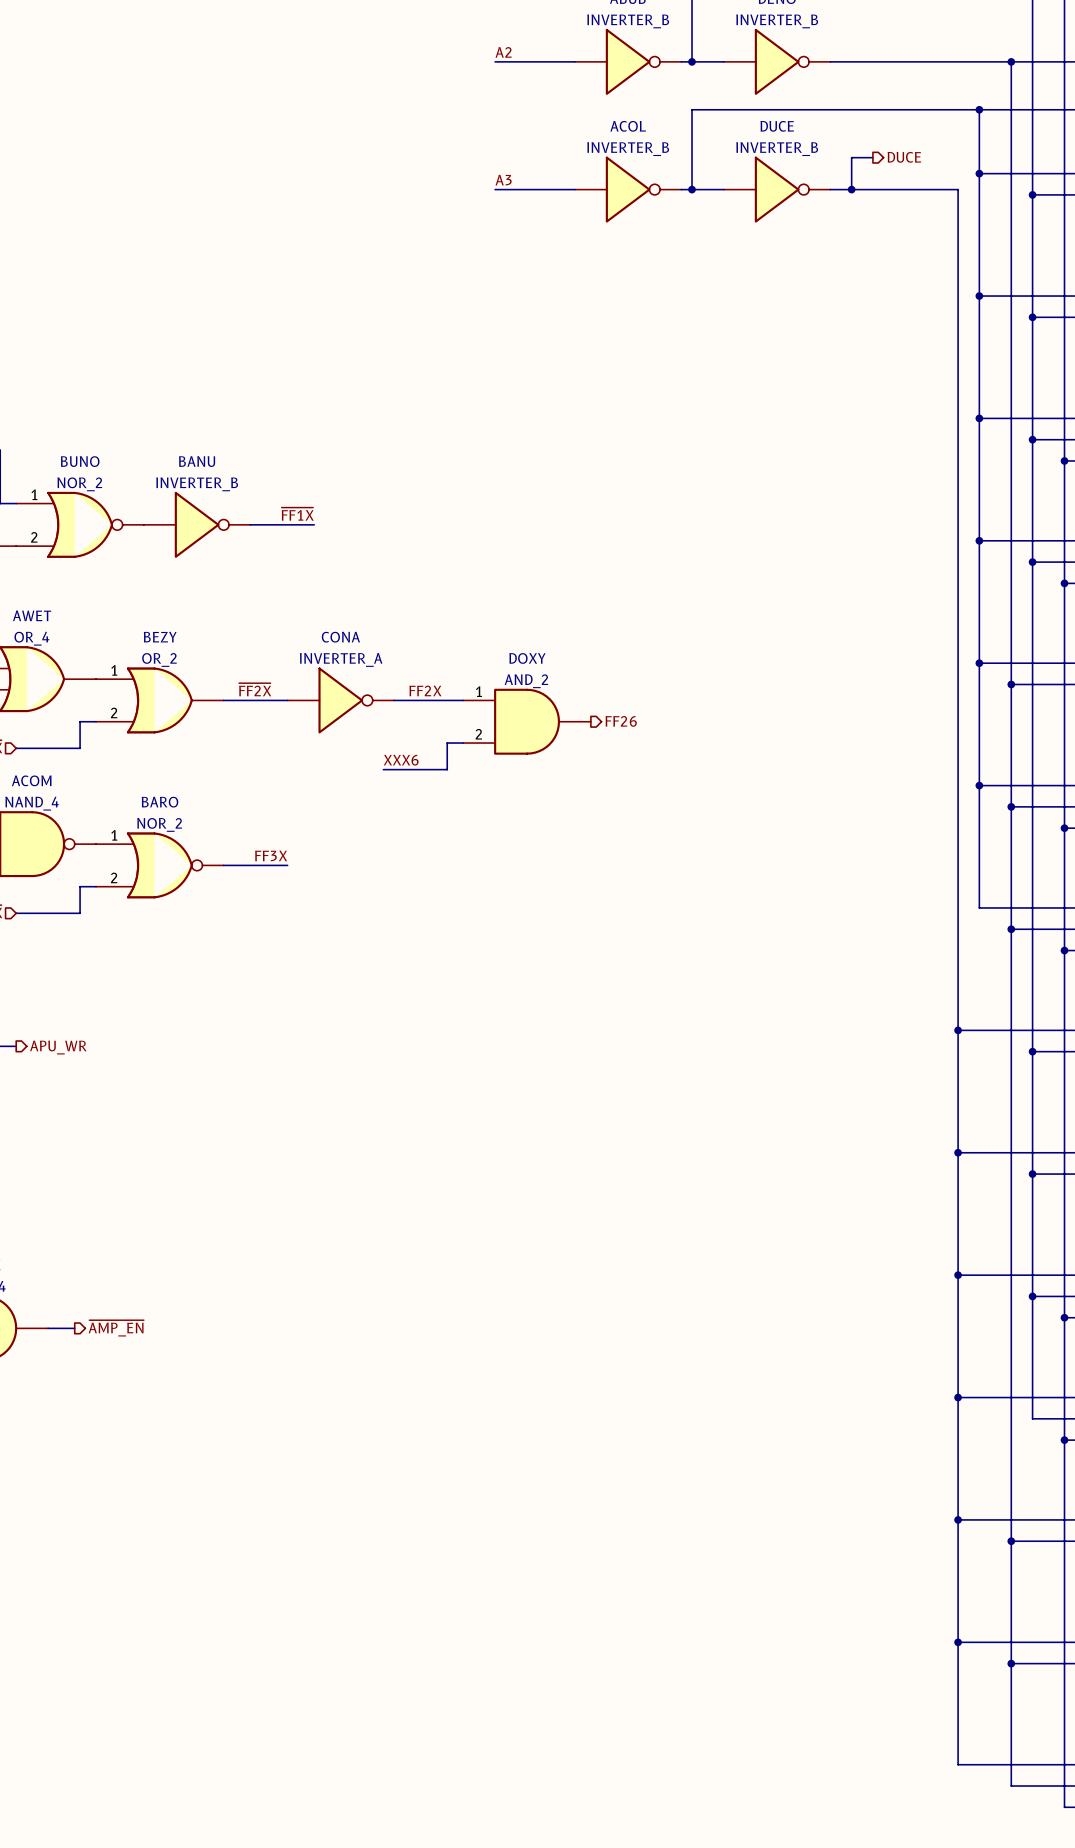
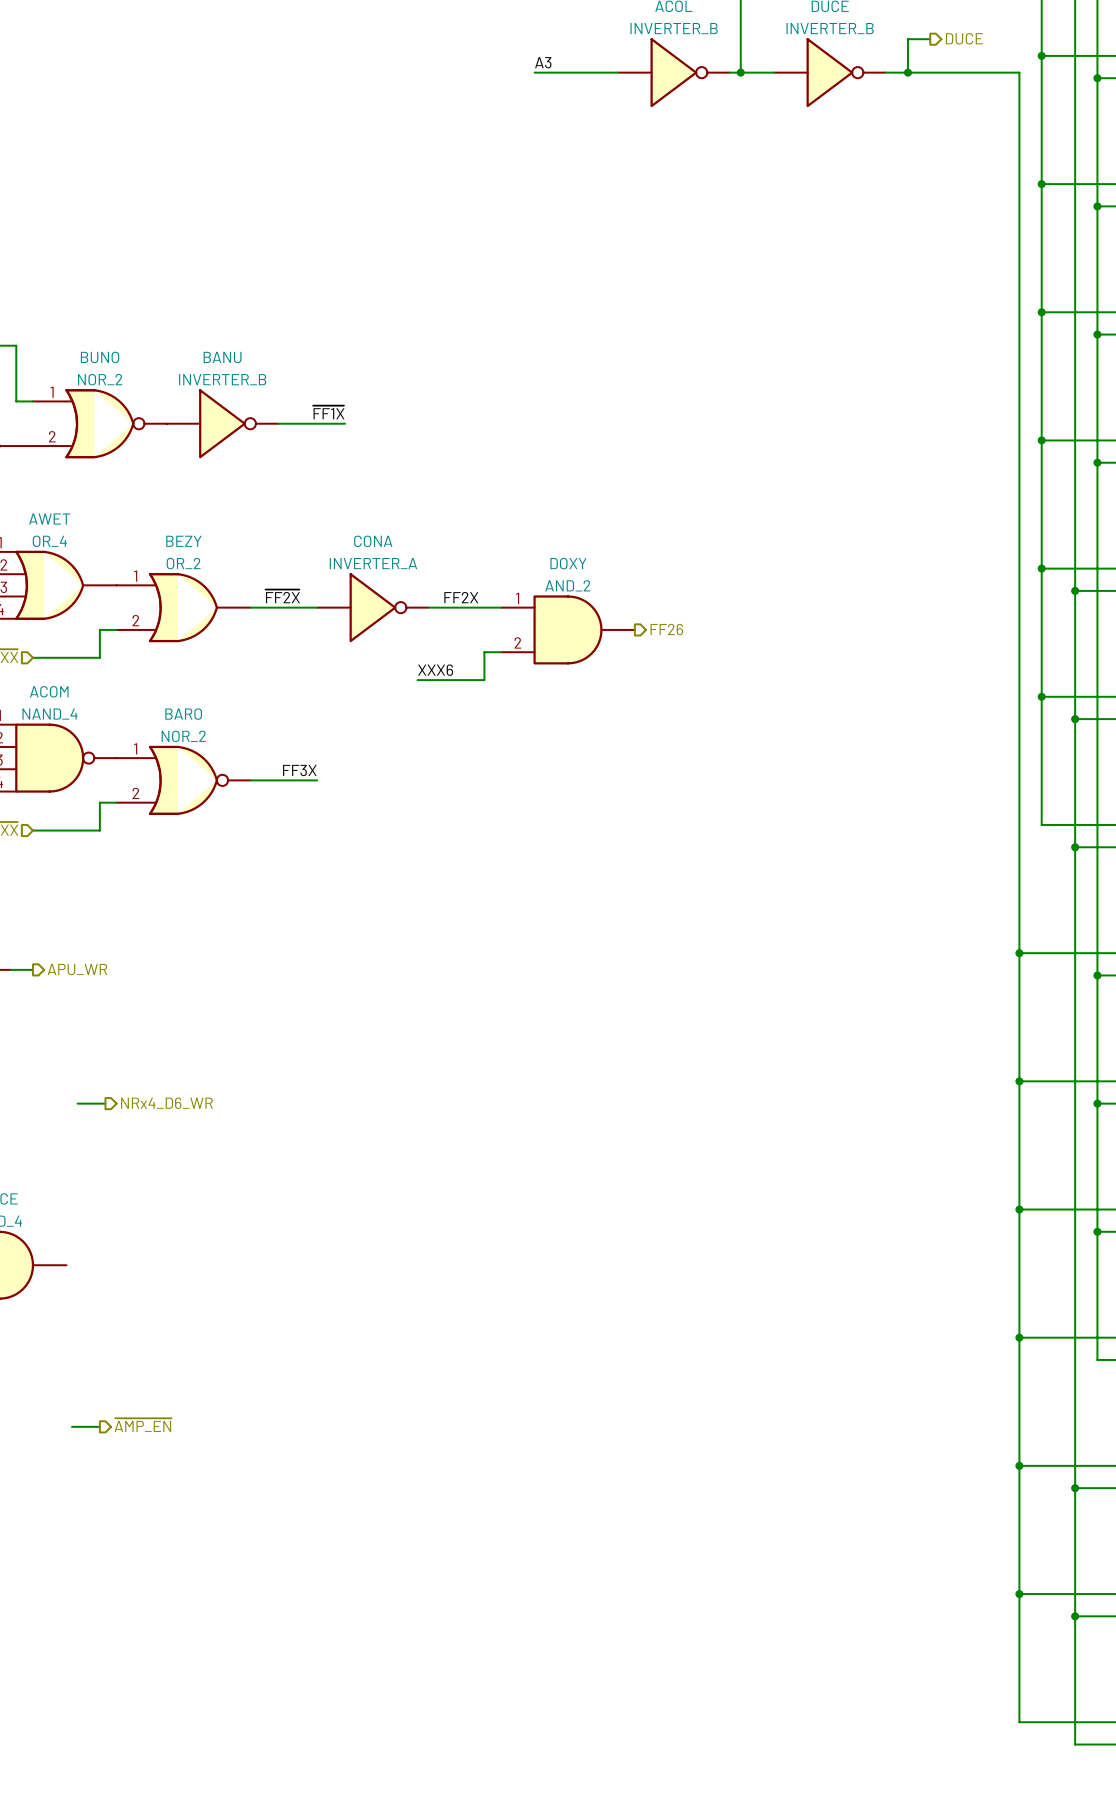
wire: none -> (77, 1103) (105, 1103)
hierarchical label: none -> NRx4_D6_WR (166, 1103)
wire: (48, 1328) (74, 1328) -> (72, 1426) (99, 1426)
hierarchical label position: ~{AMP_EN} (116, 1328) -> ~{AMP_EN} (143, 1425)

